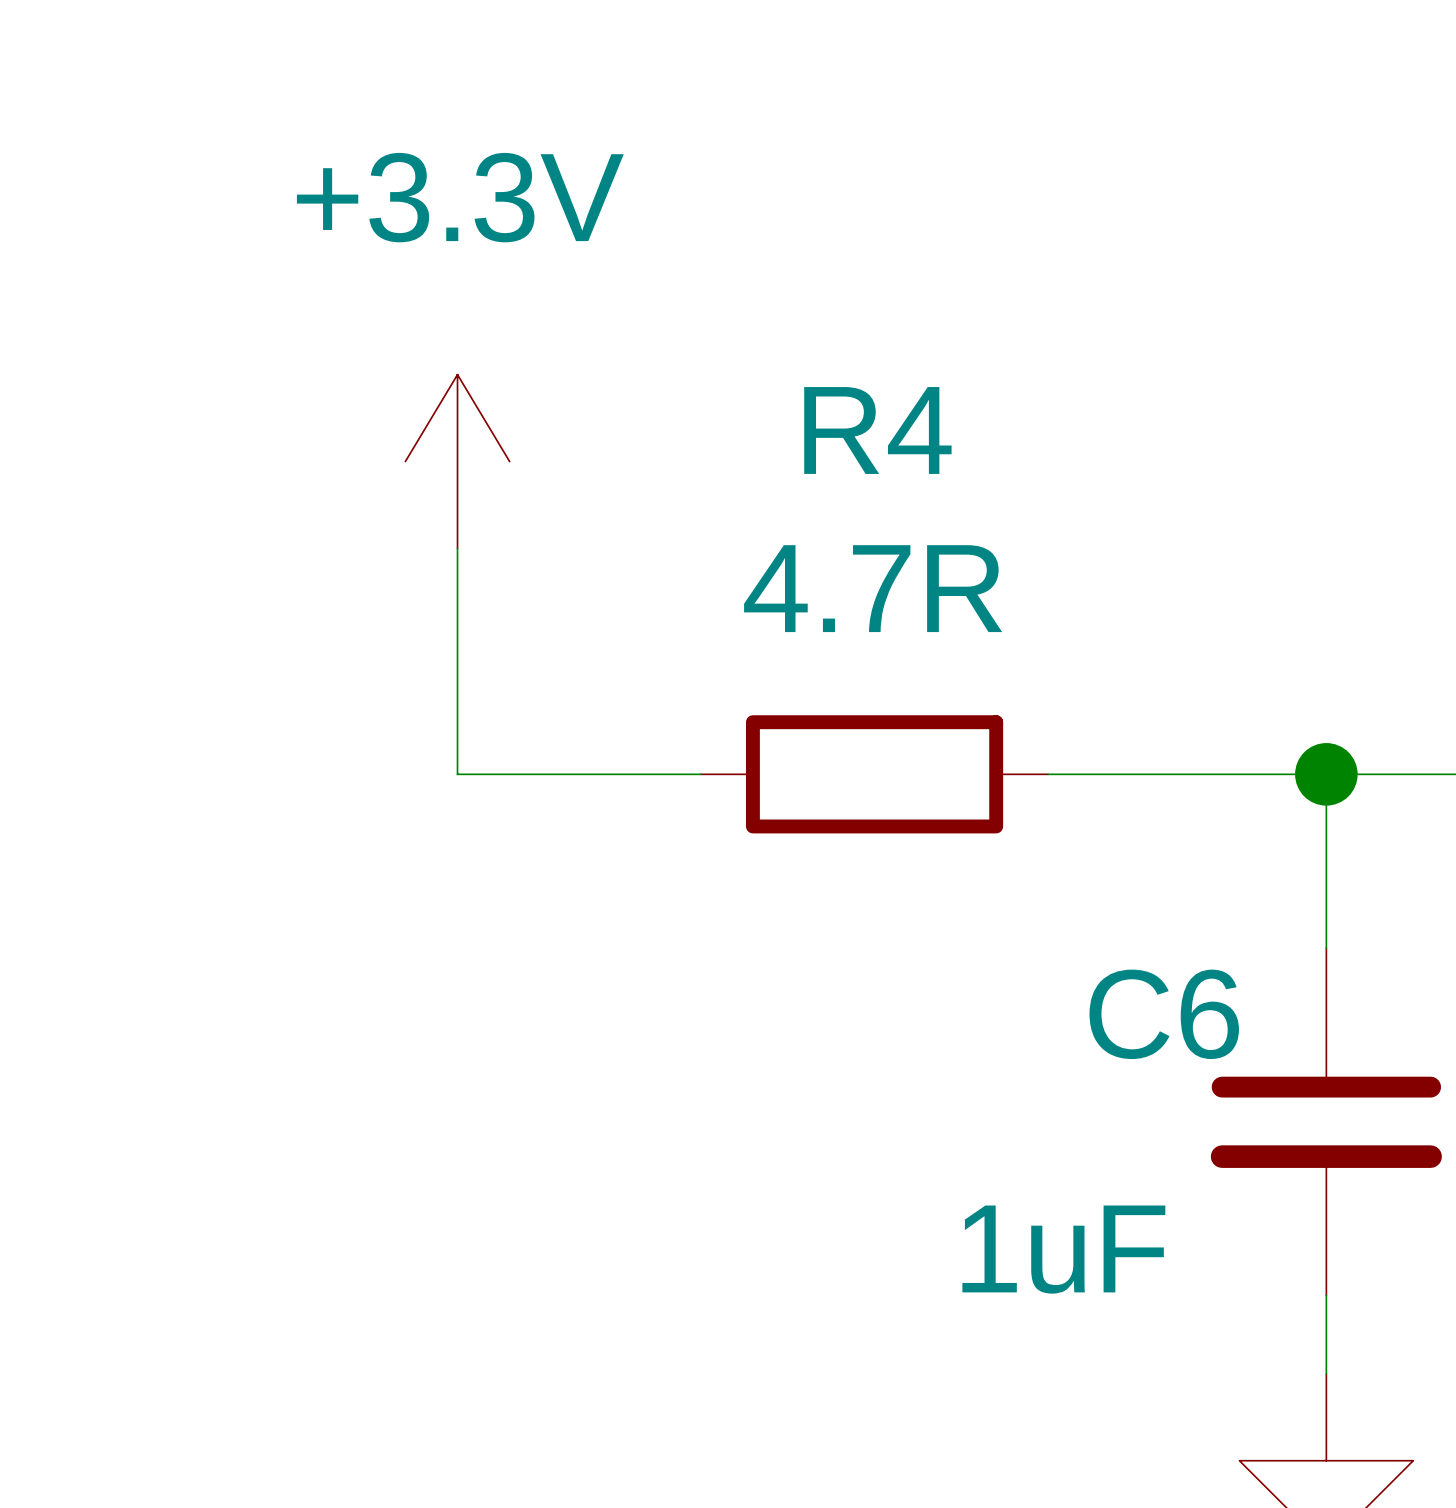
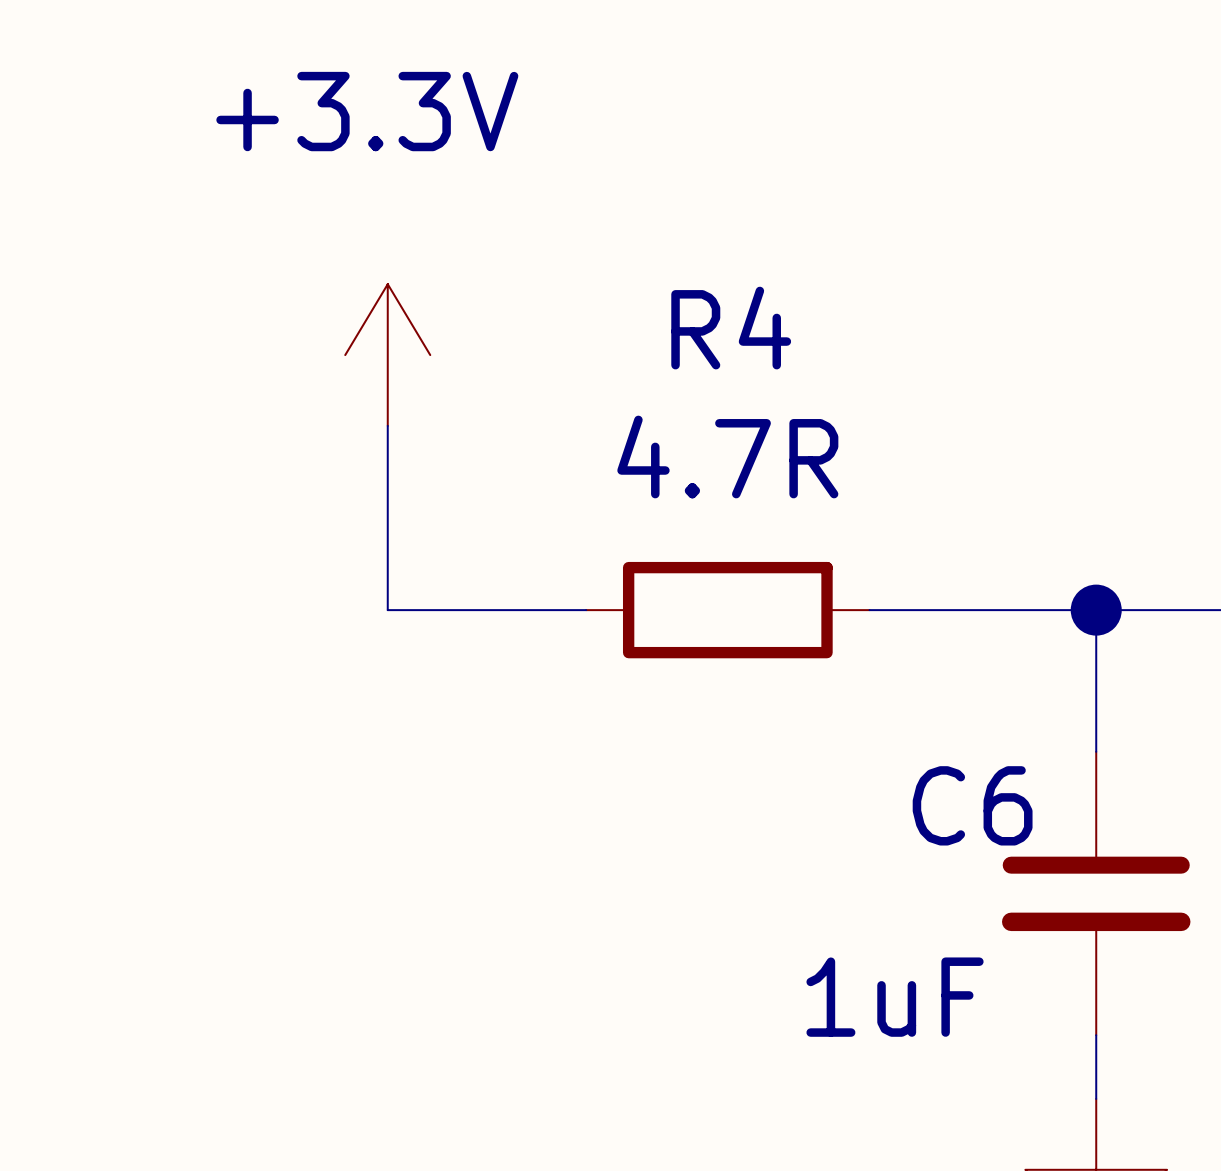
power symbol text position: +3.3V (460, 197) -> +3.3V (367, 111)

